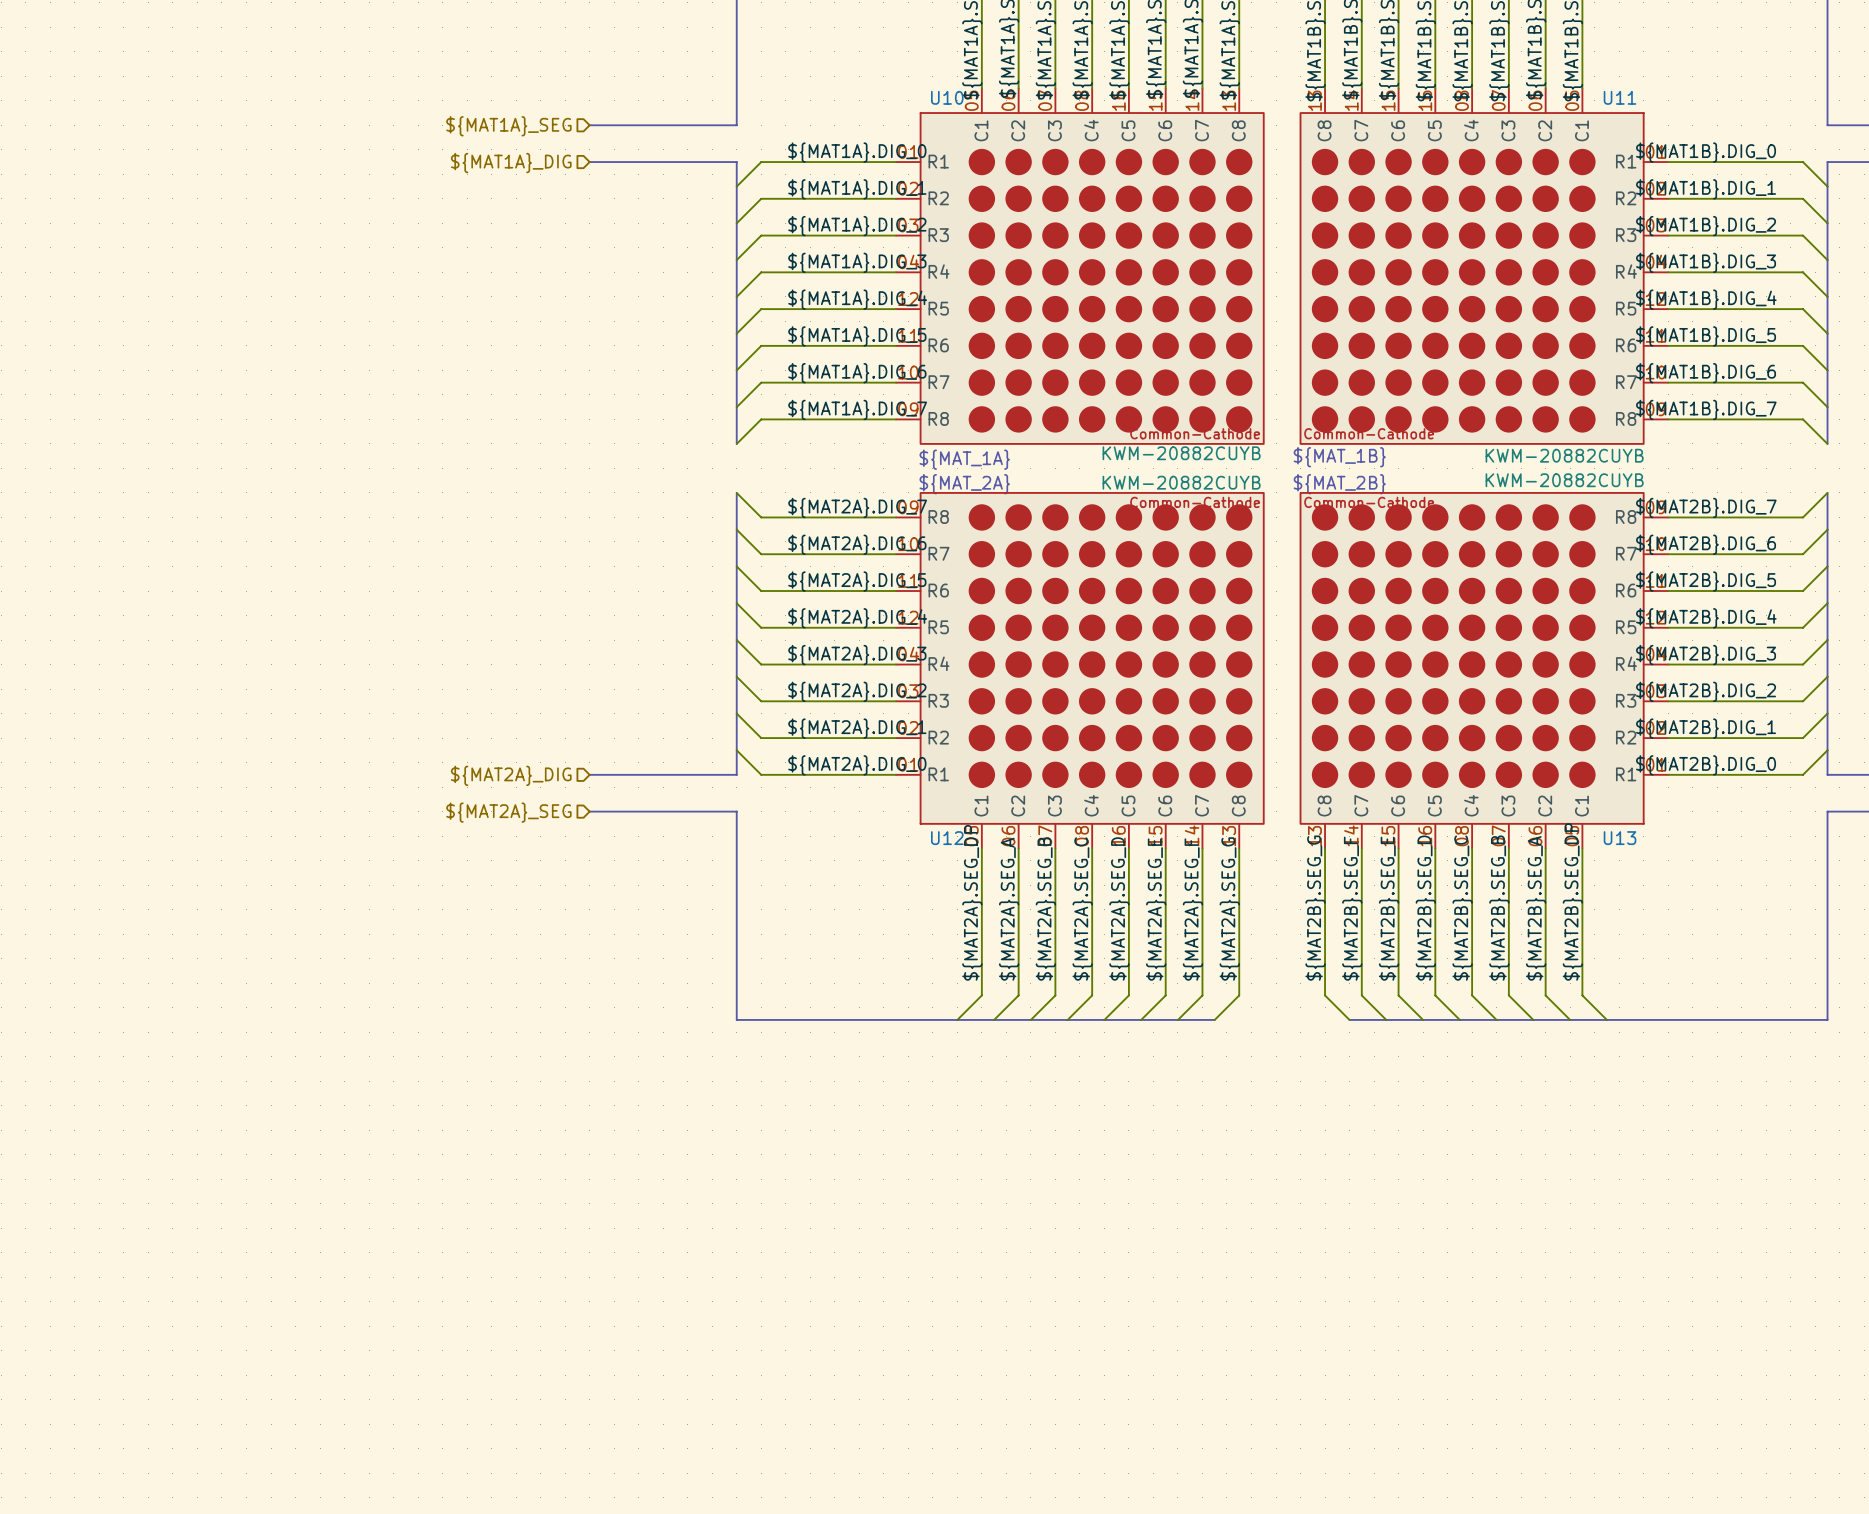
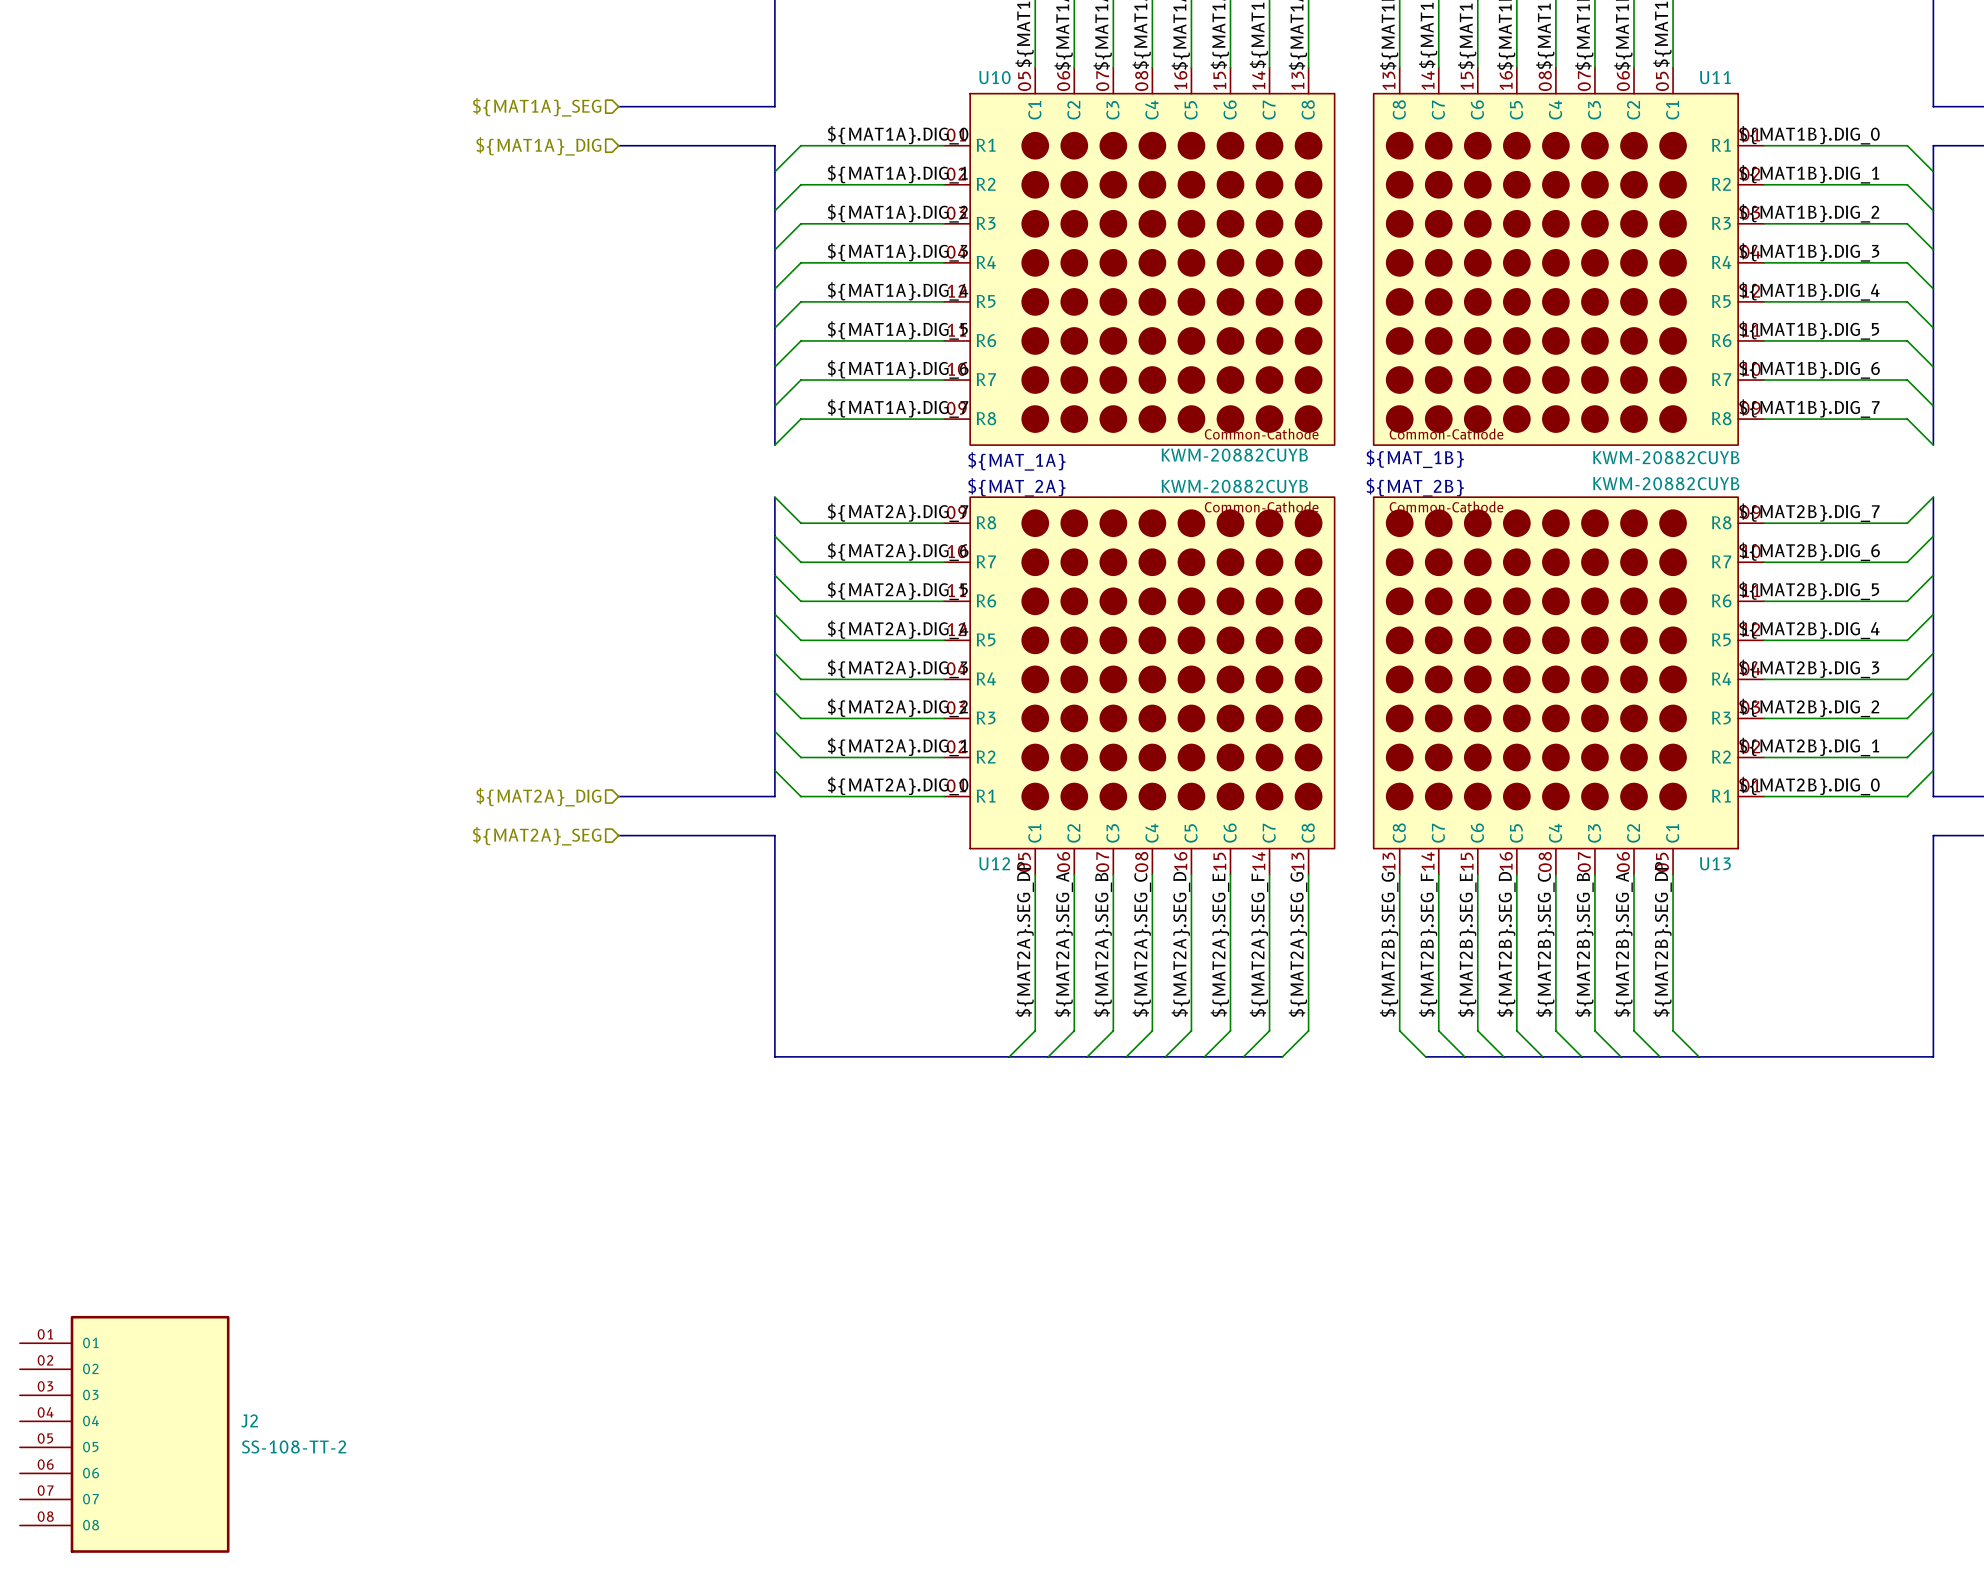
J2: none -> SS-108-TT-2 (124, 1434)

